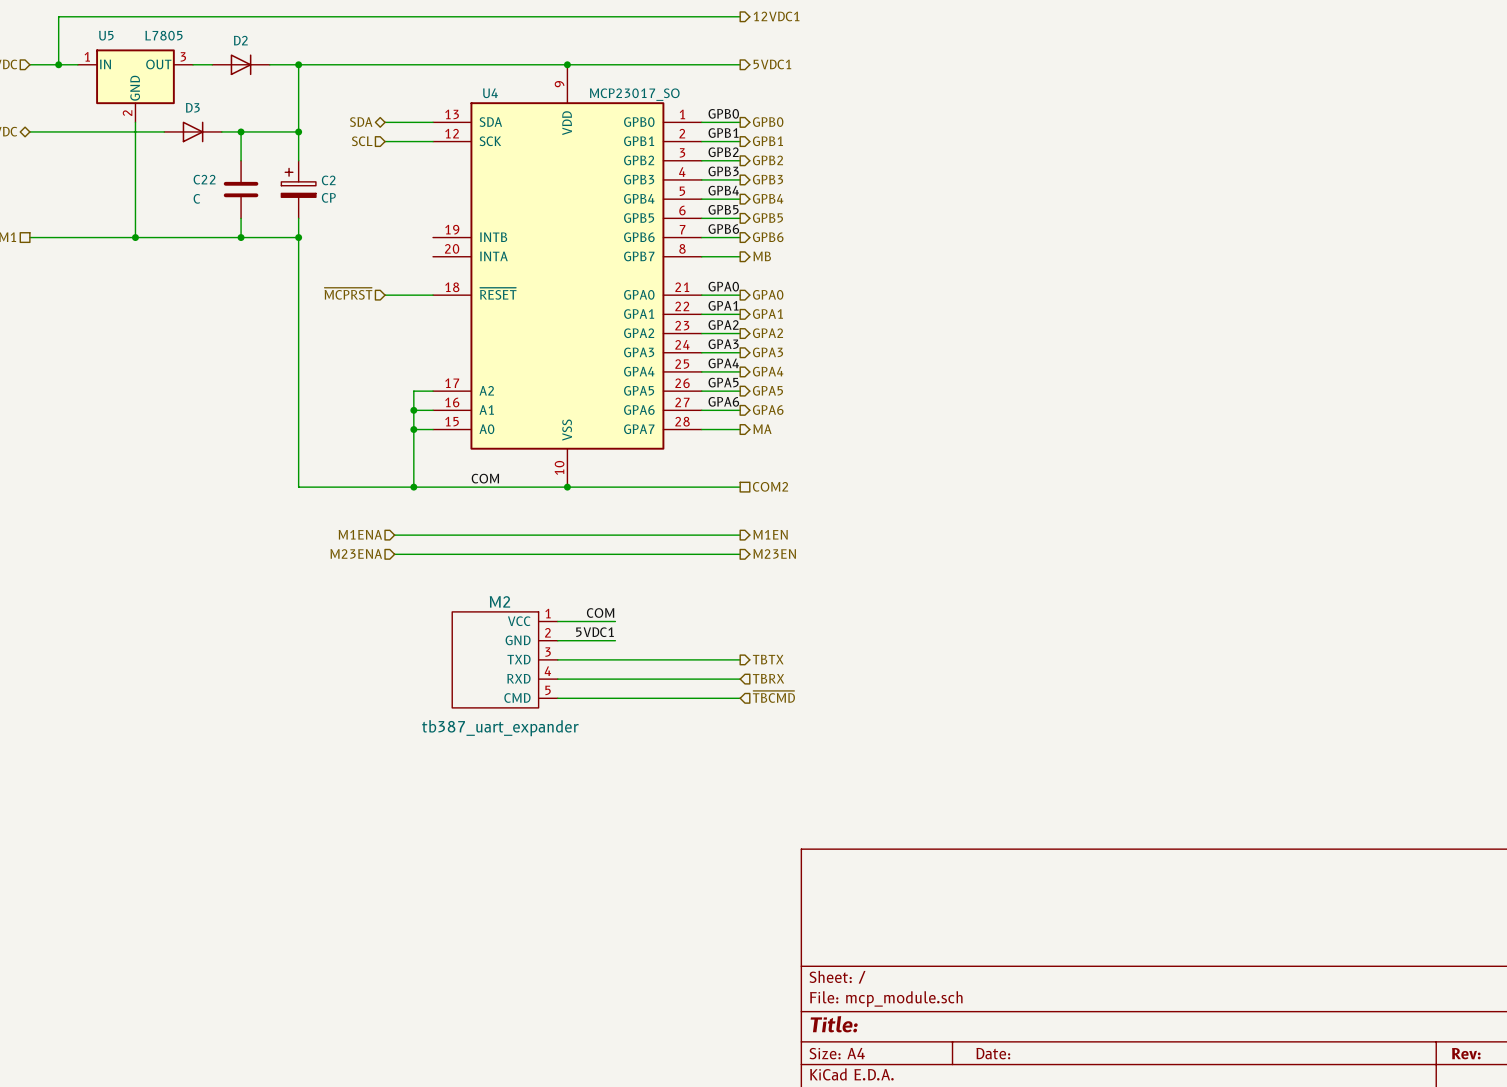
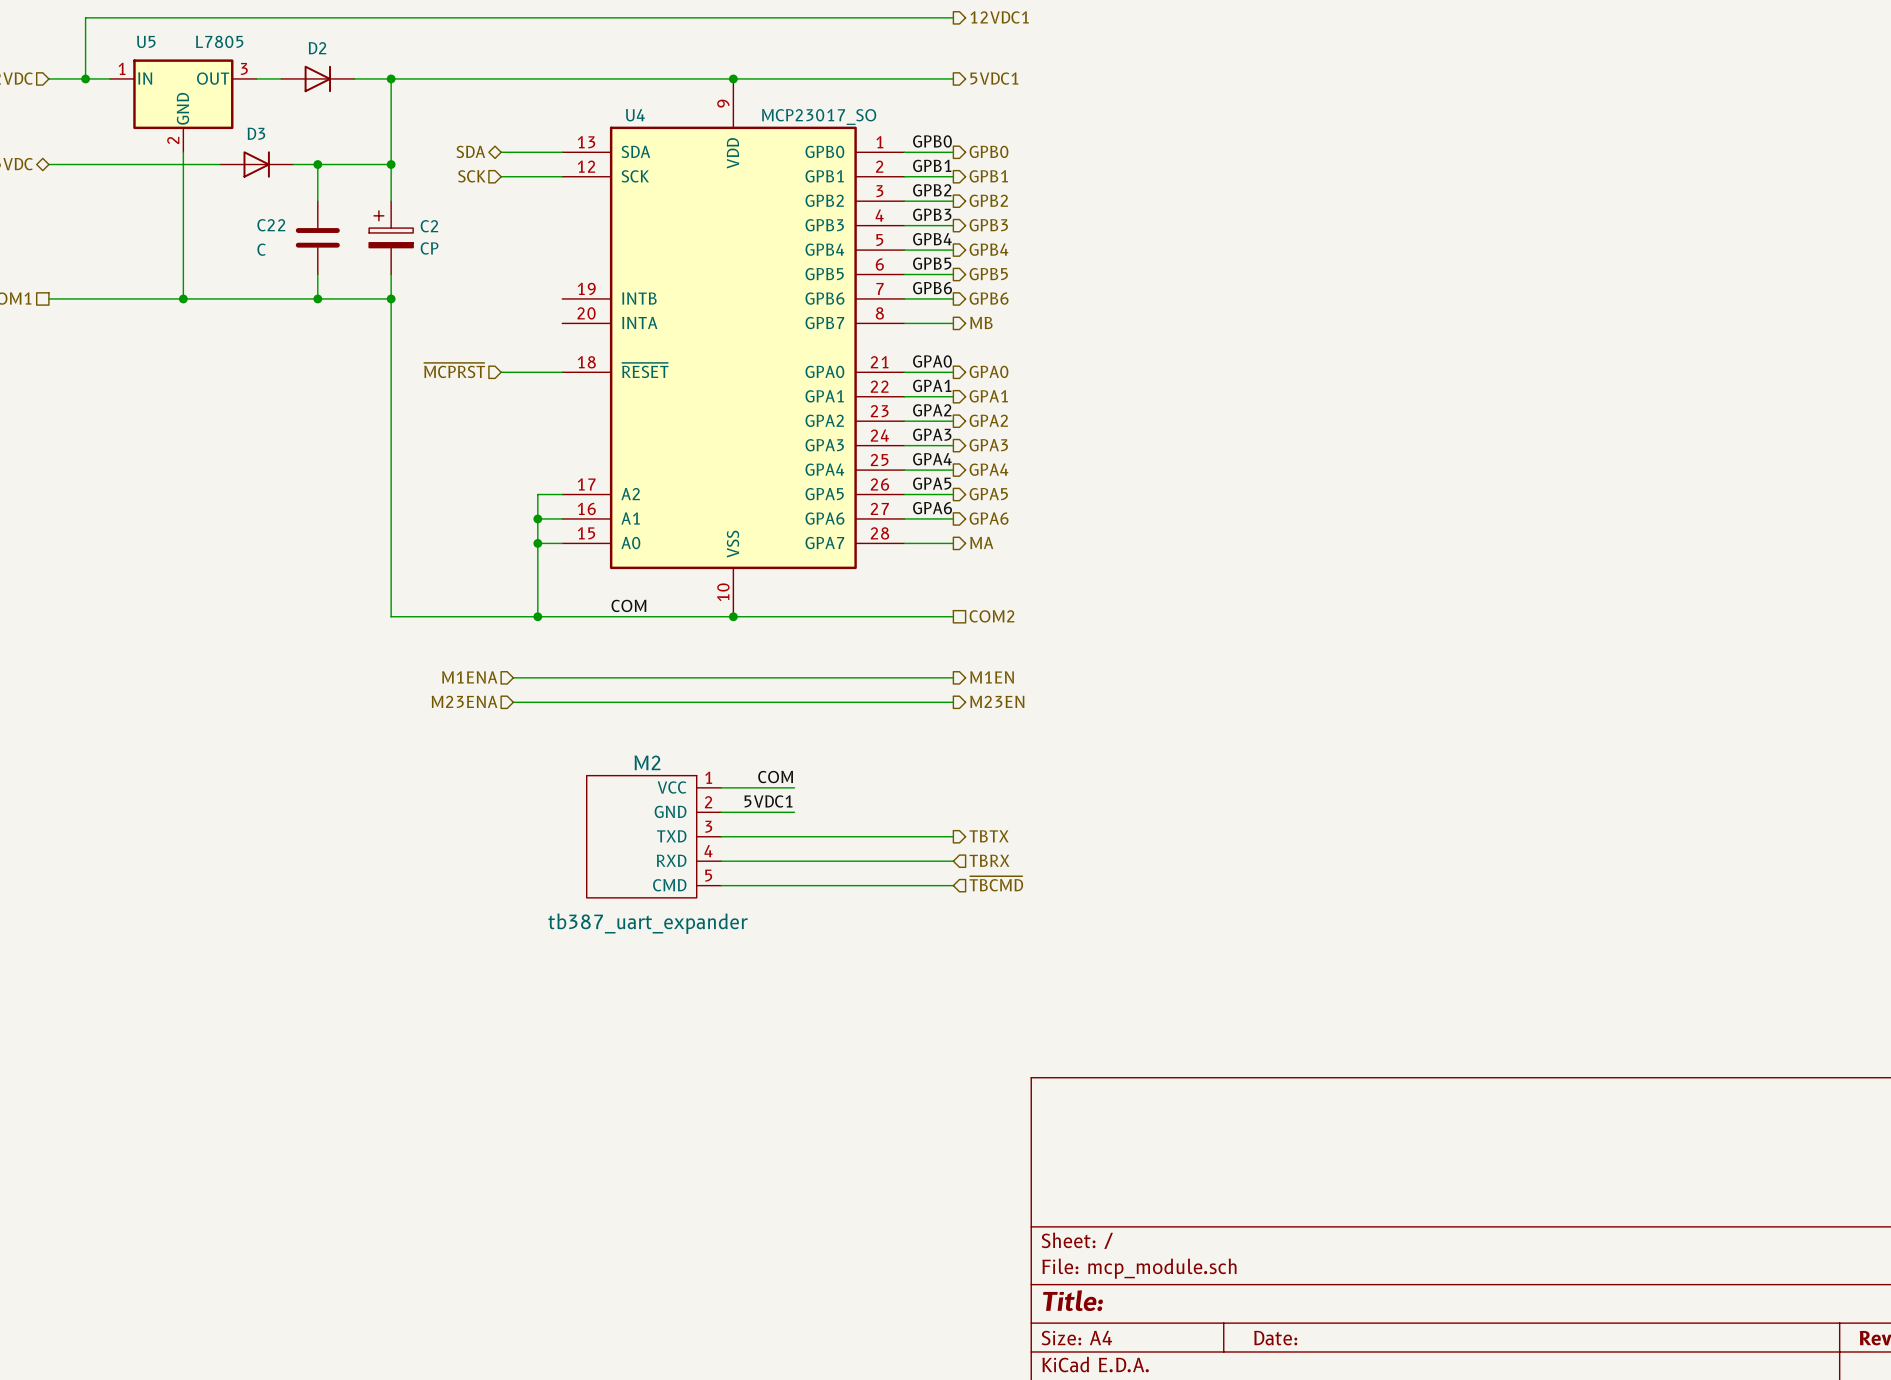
hierarchical label: SCL (362, 141) -> SCK (471, 176)

